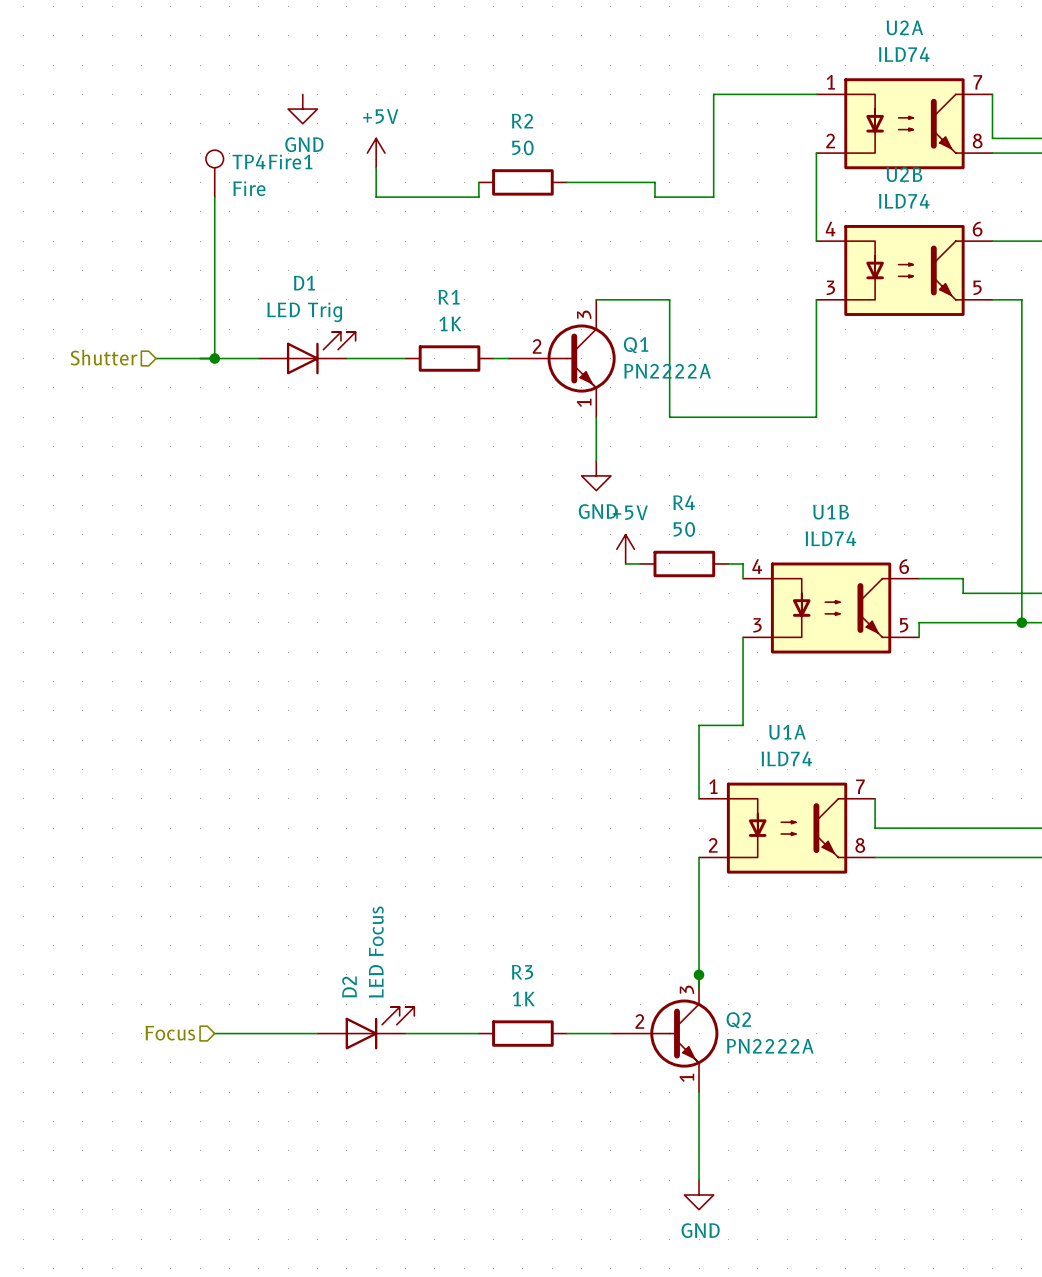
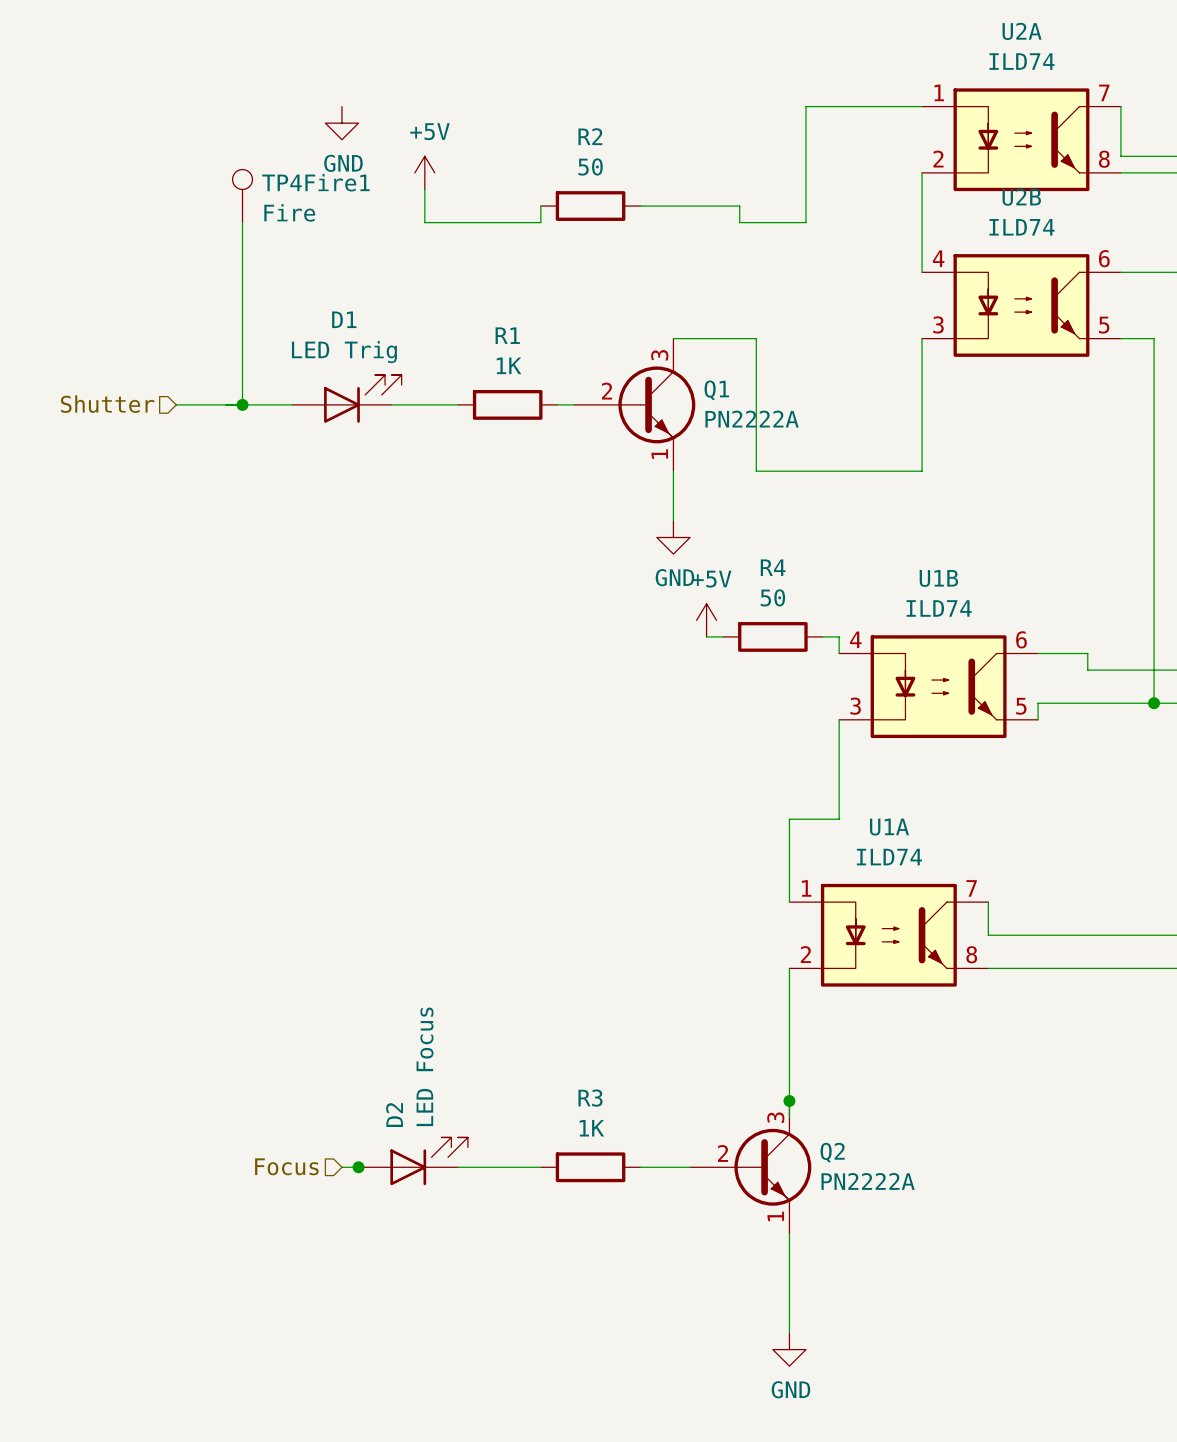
hierarchical label position: Focus (170, 1033) -> Focus (286, 1166)
wire: (214, 1033) (302, 1033) -> none
junction: none -> (358, 1167)

